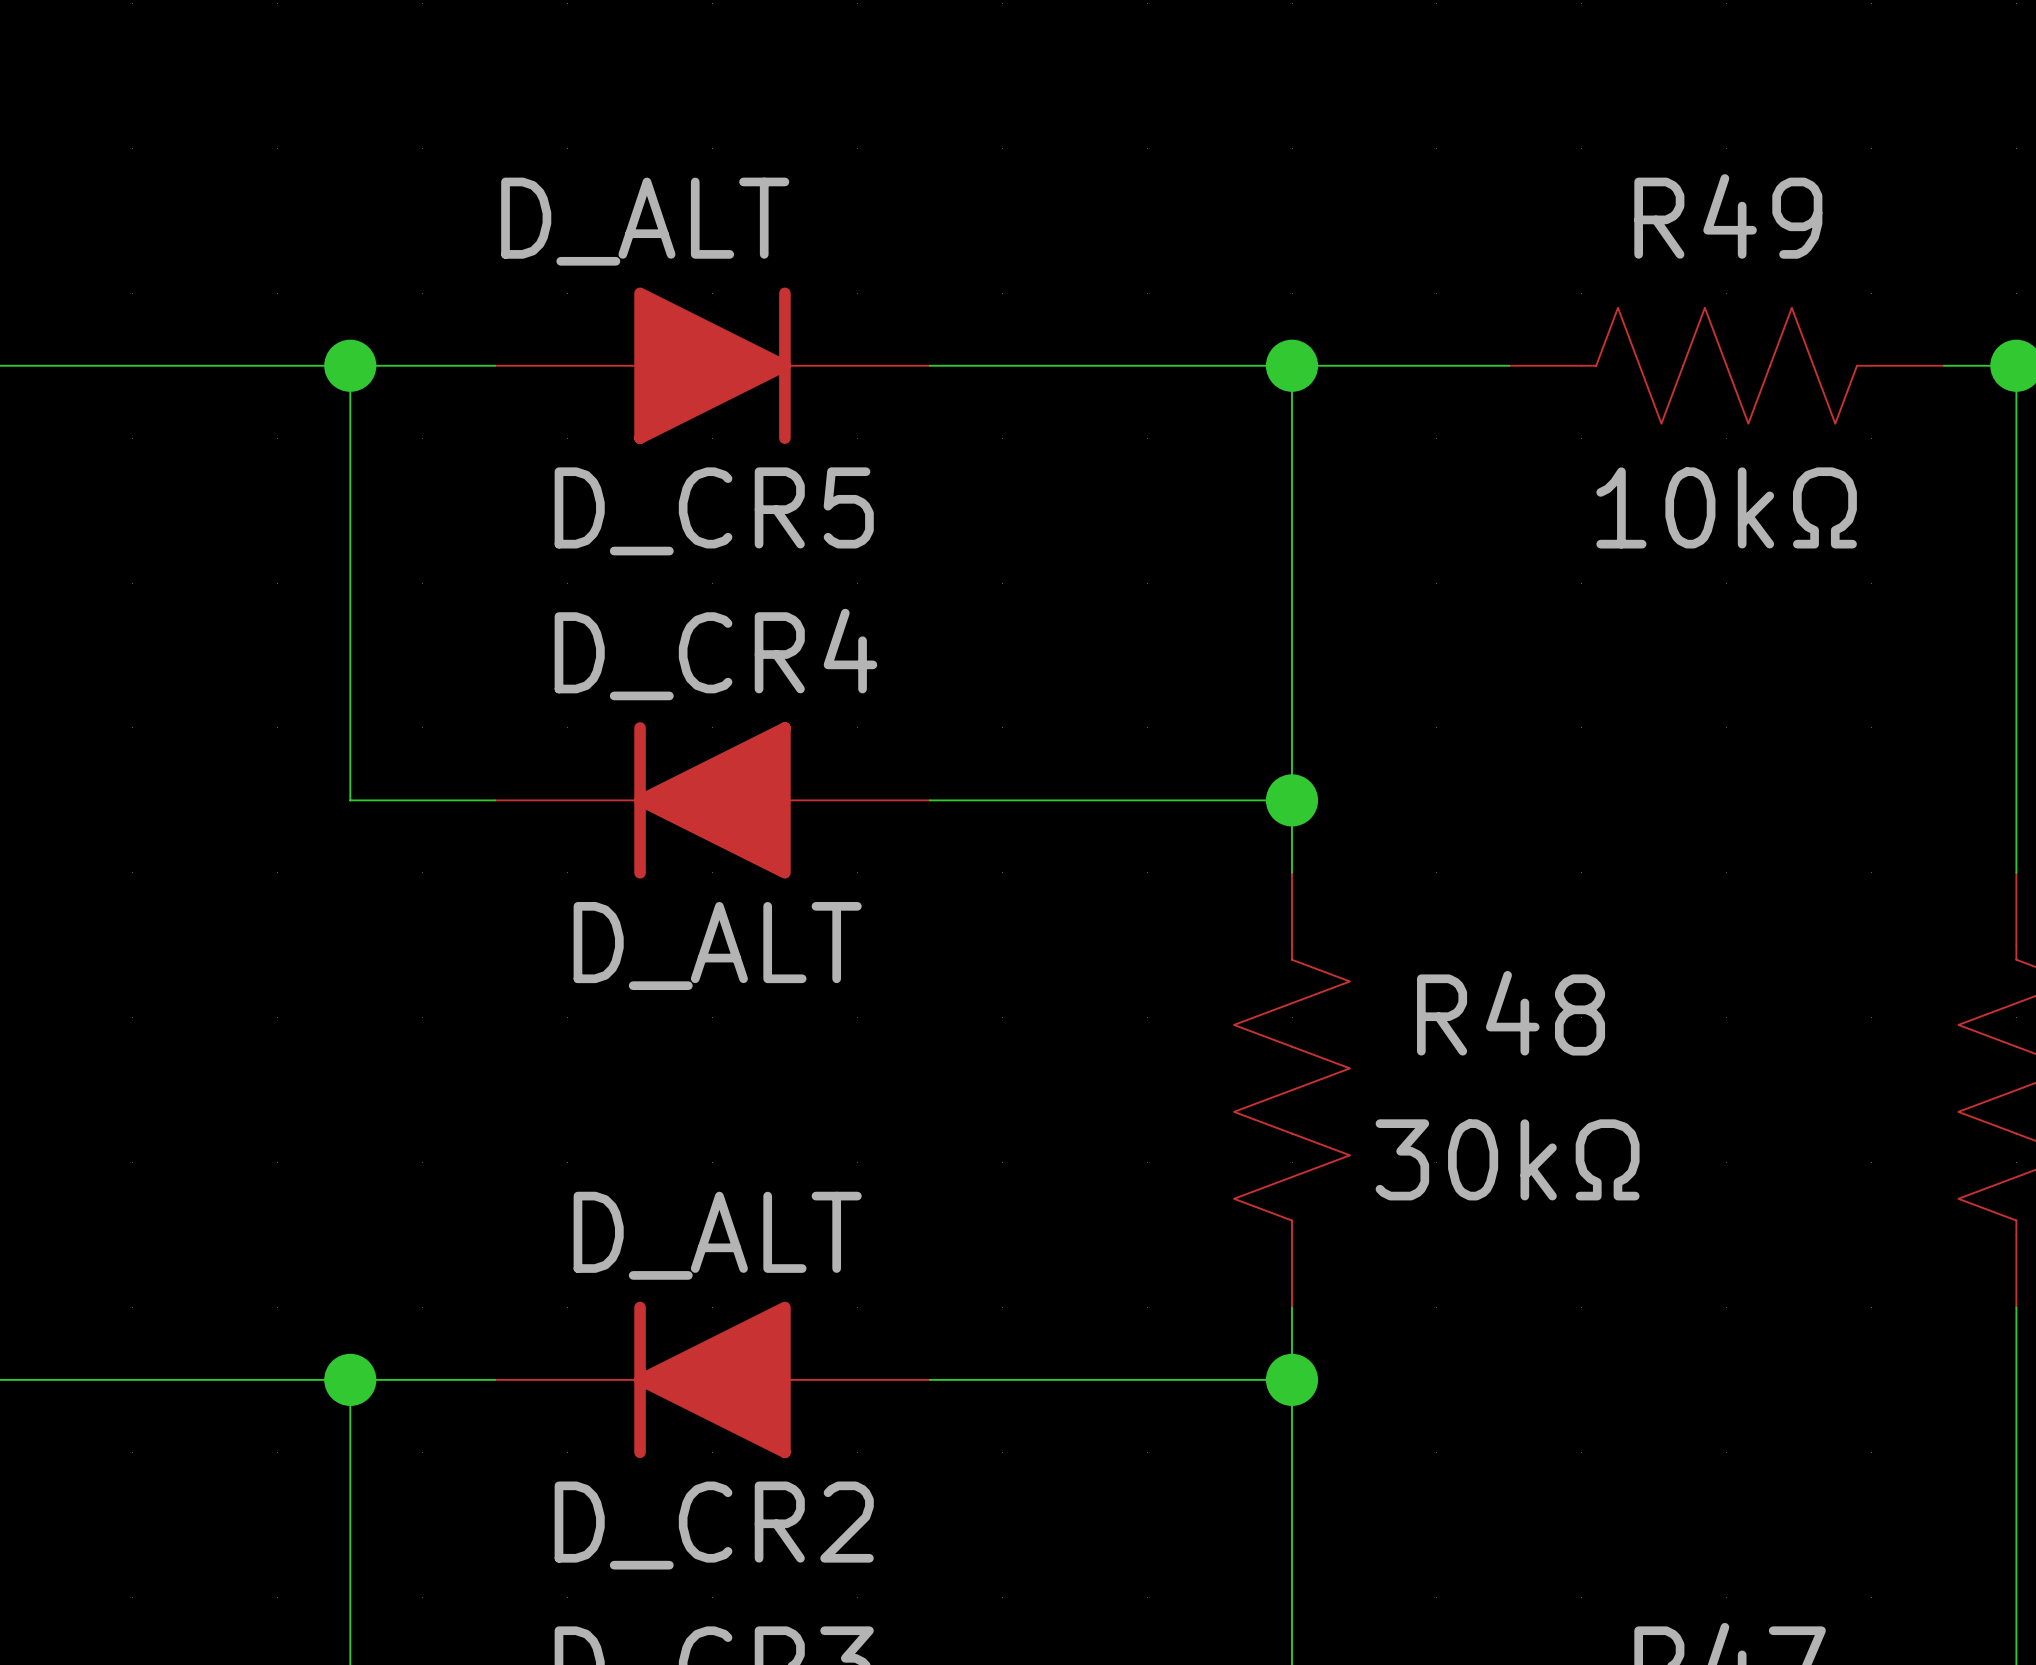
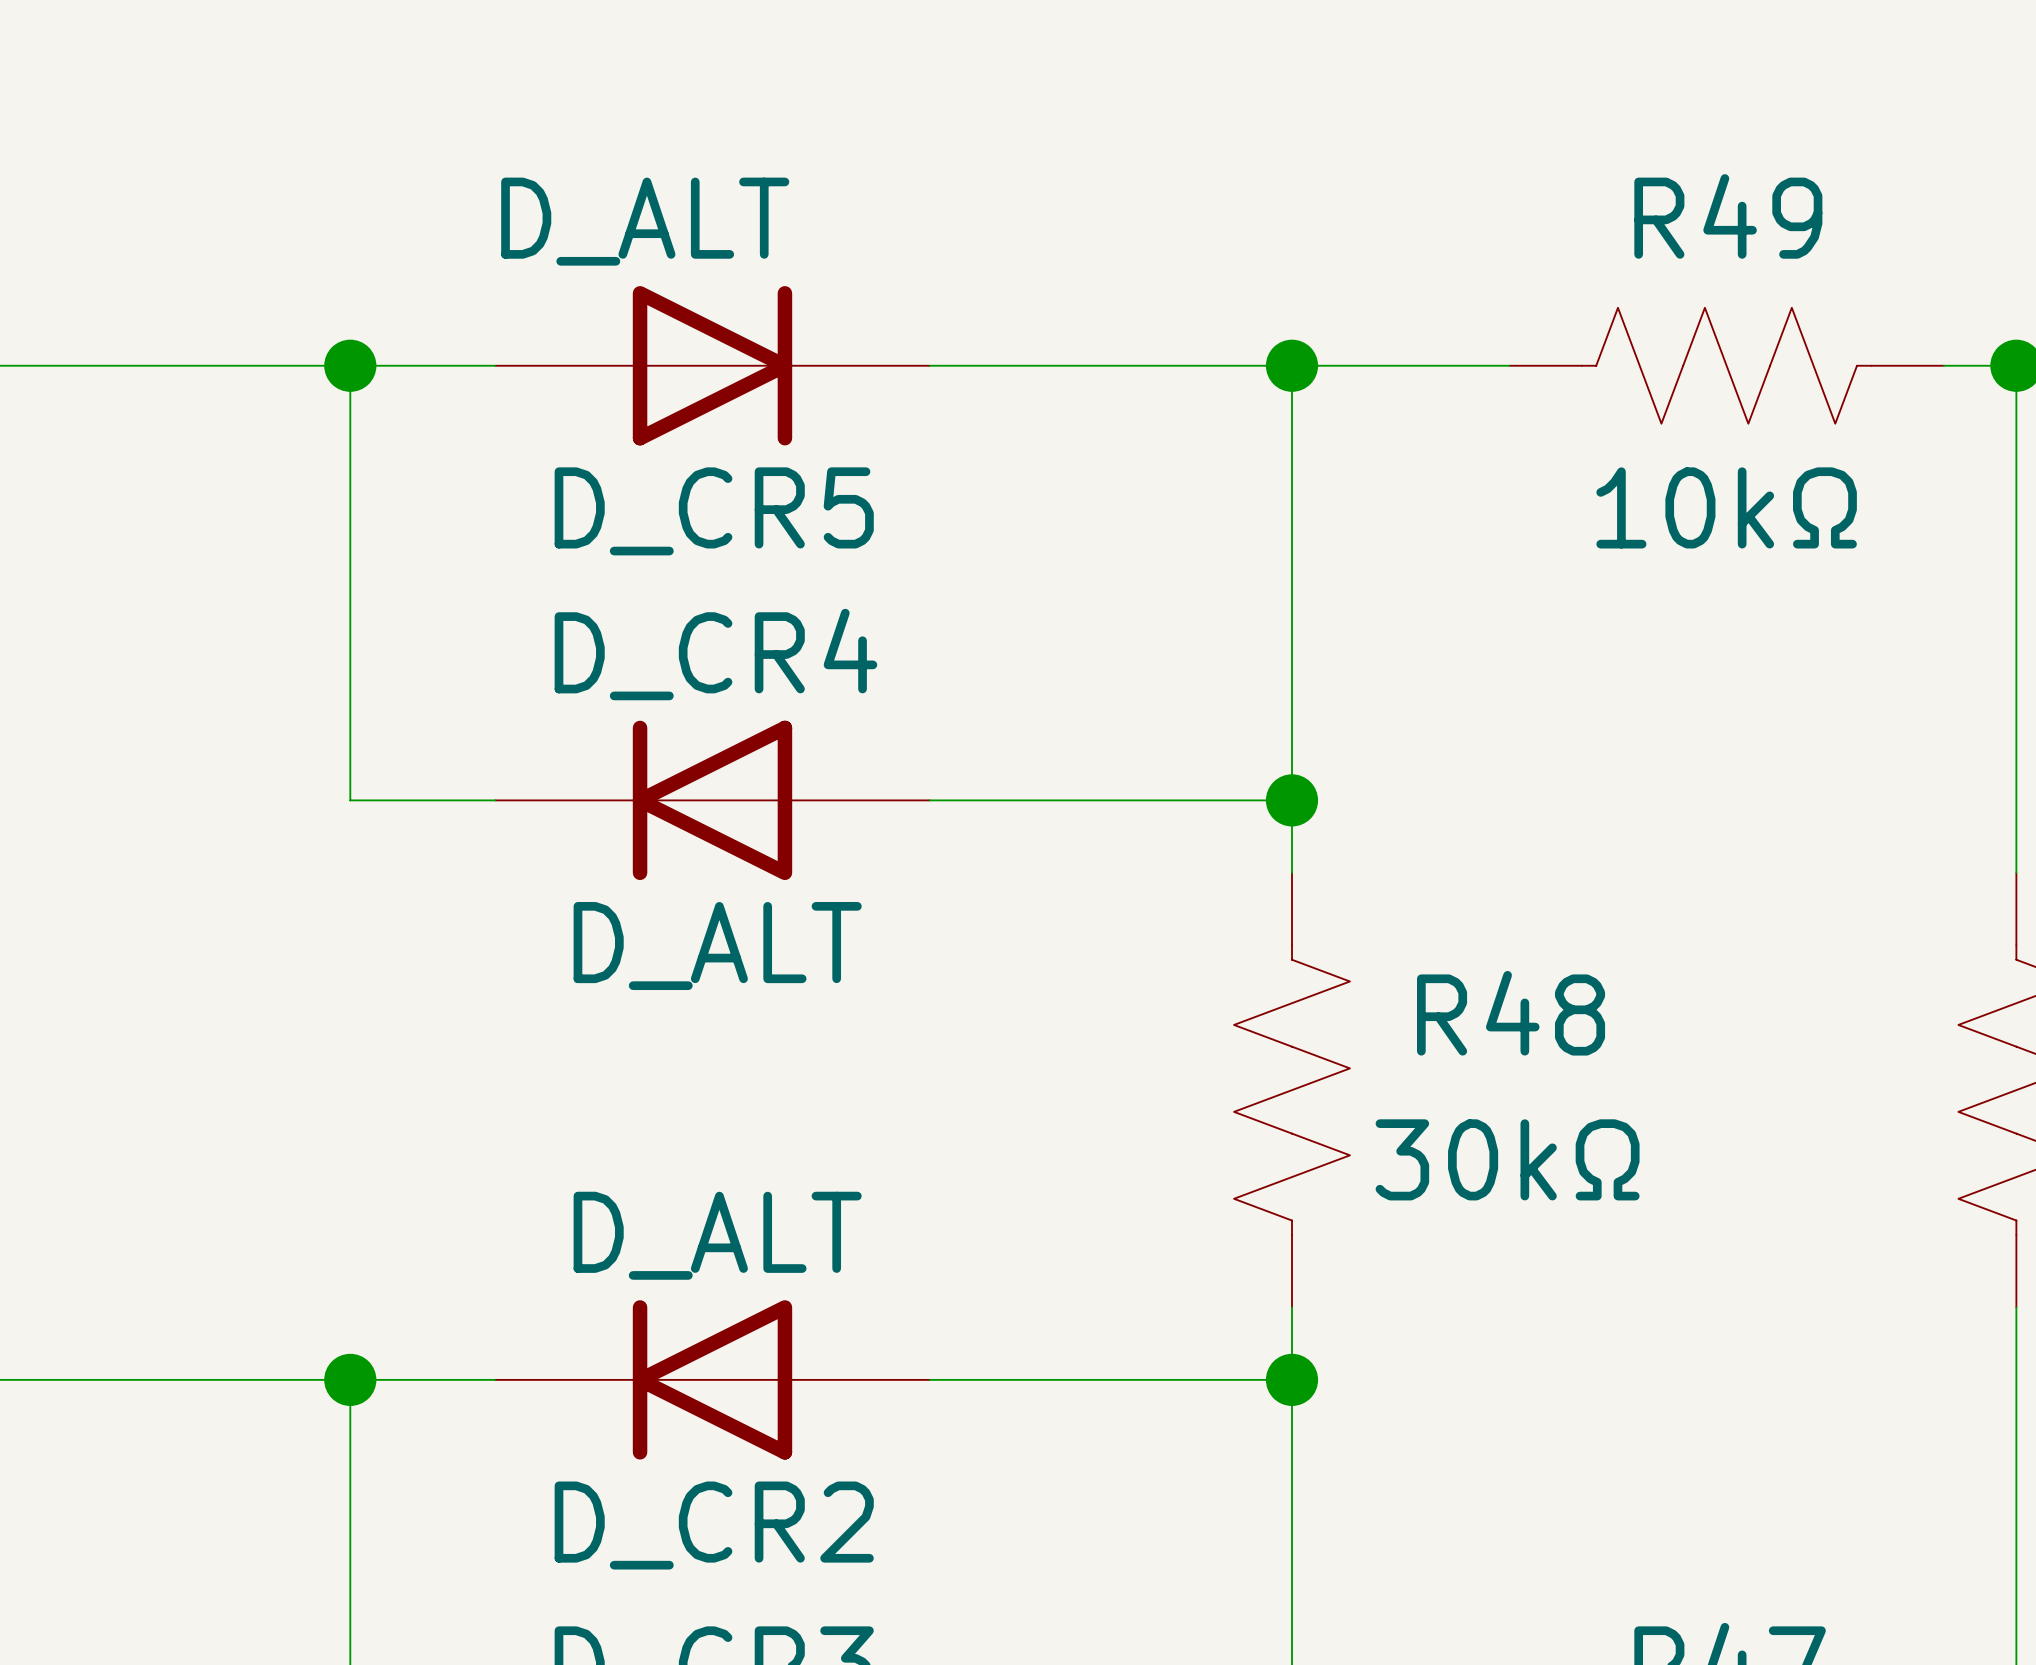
D_CR5 symbol: [495, 287, 930, 444] -> [495, 286, 930, 446]
D_CR4 symbol: [495, 722, 930, 879] -> [495, 720, 930, 881]
D_CR2 symbol: [495, 1301, 930, 1459] -> [495, 1300, 930, 1460]

